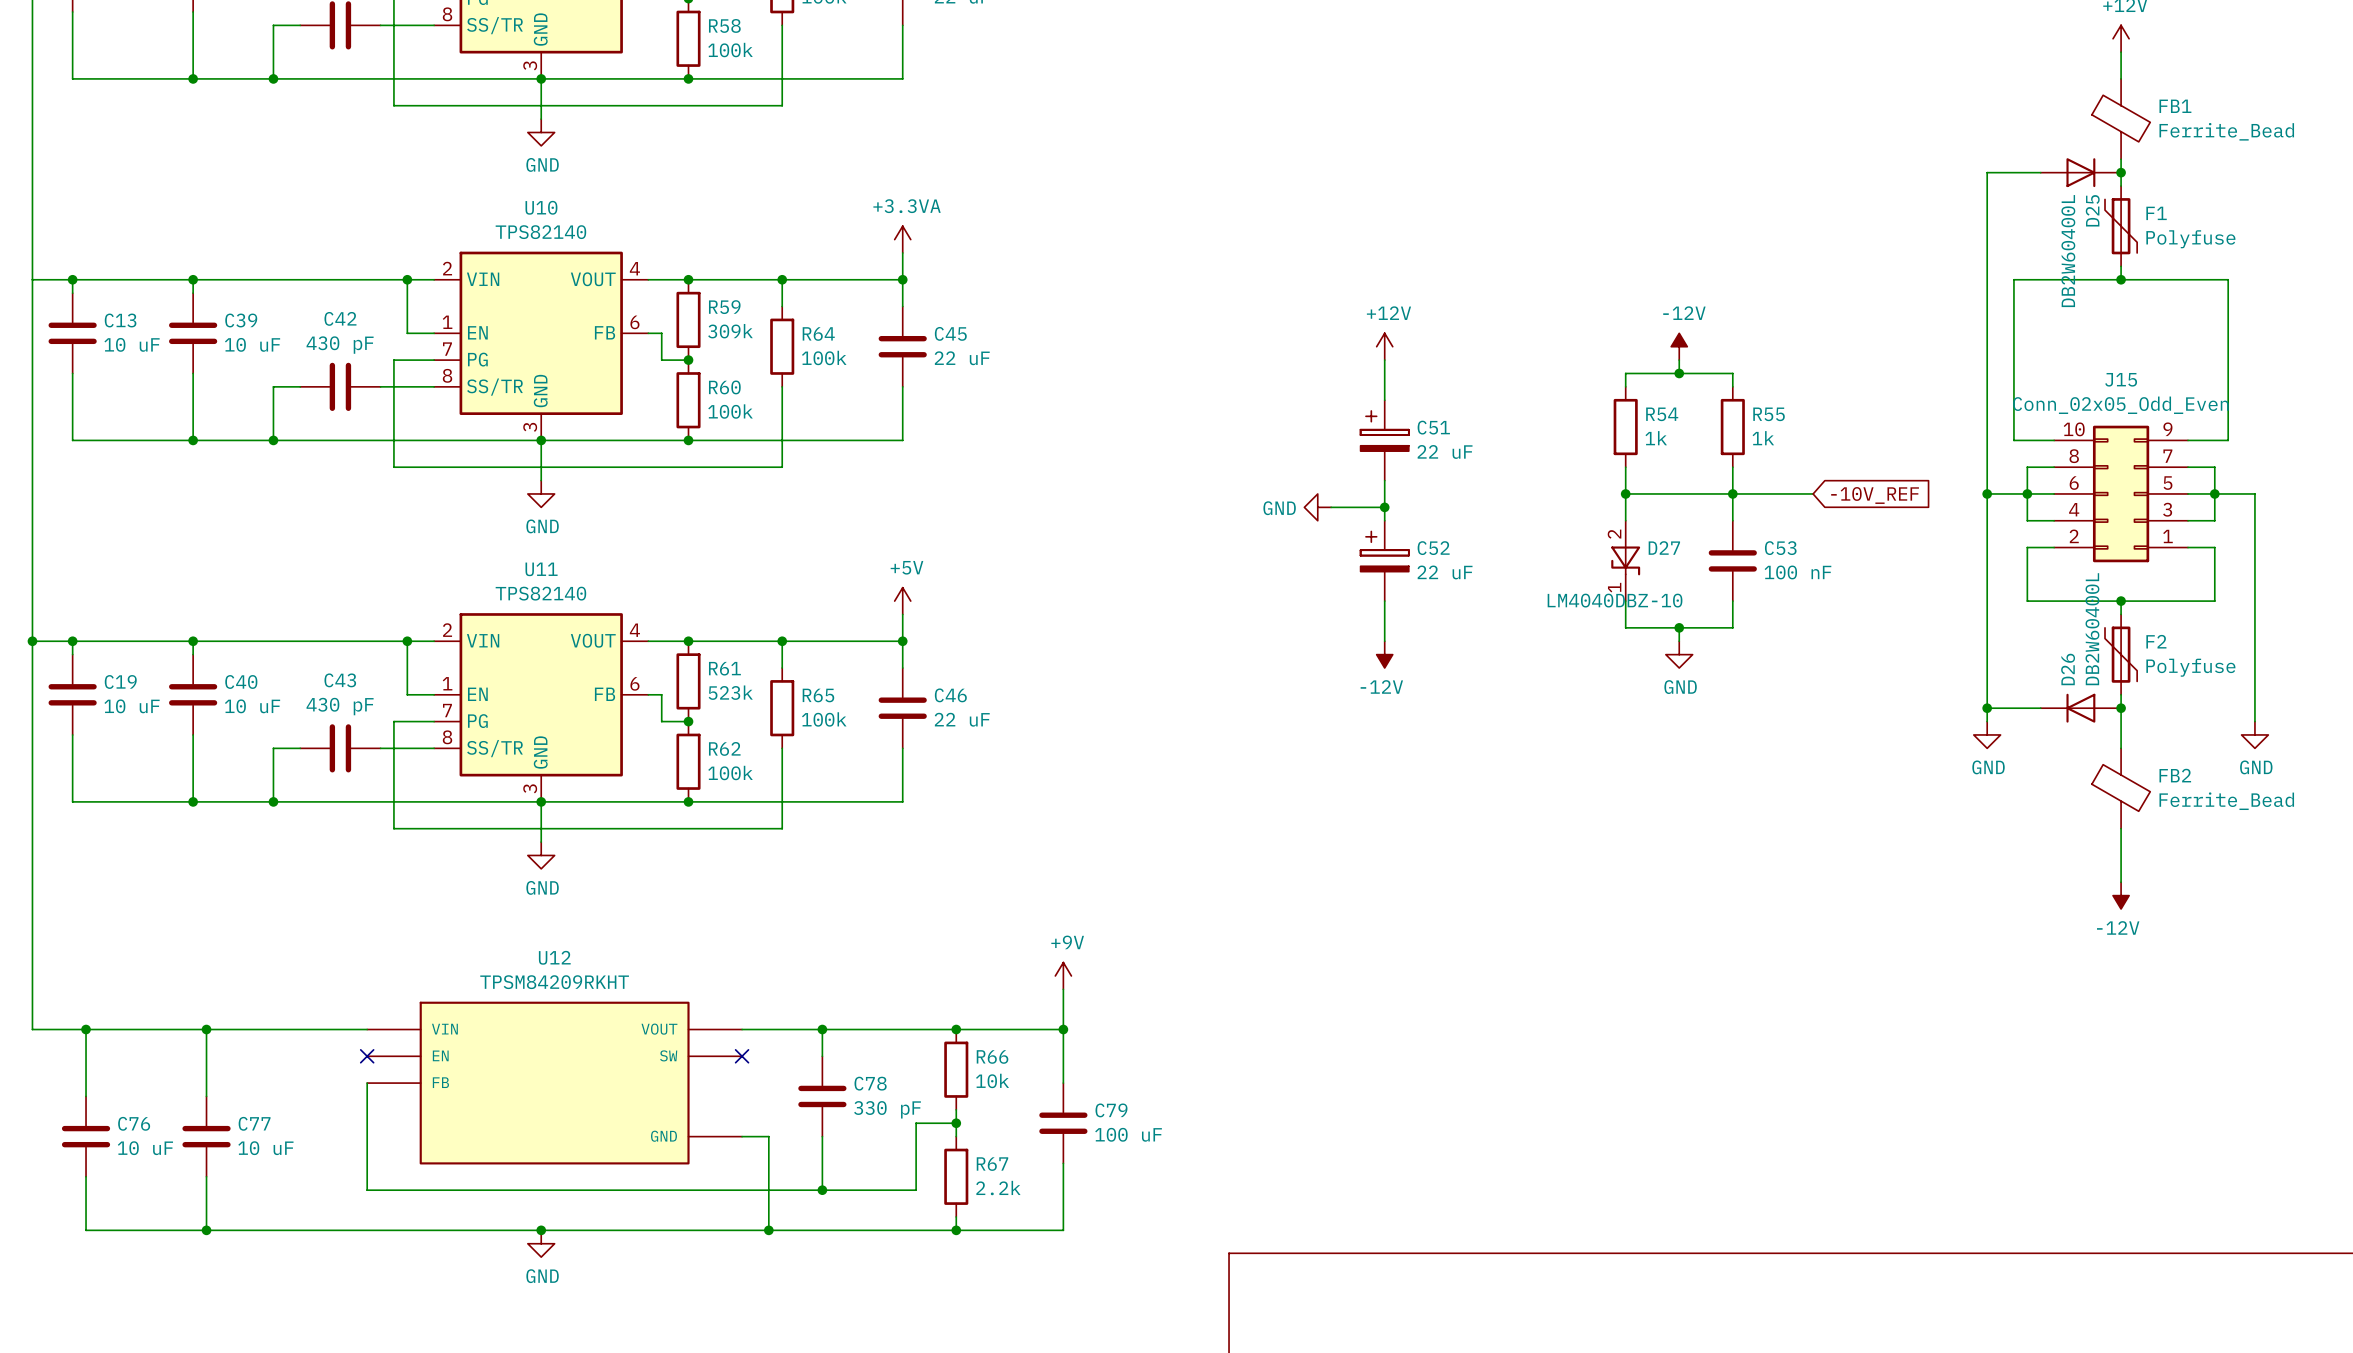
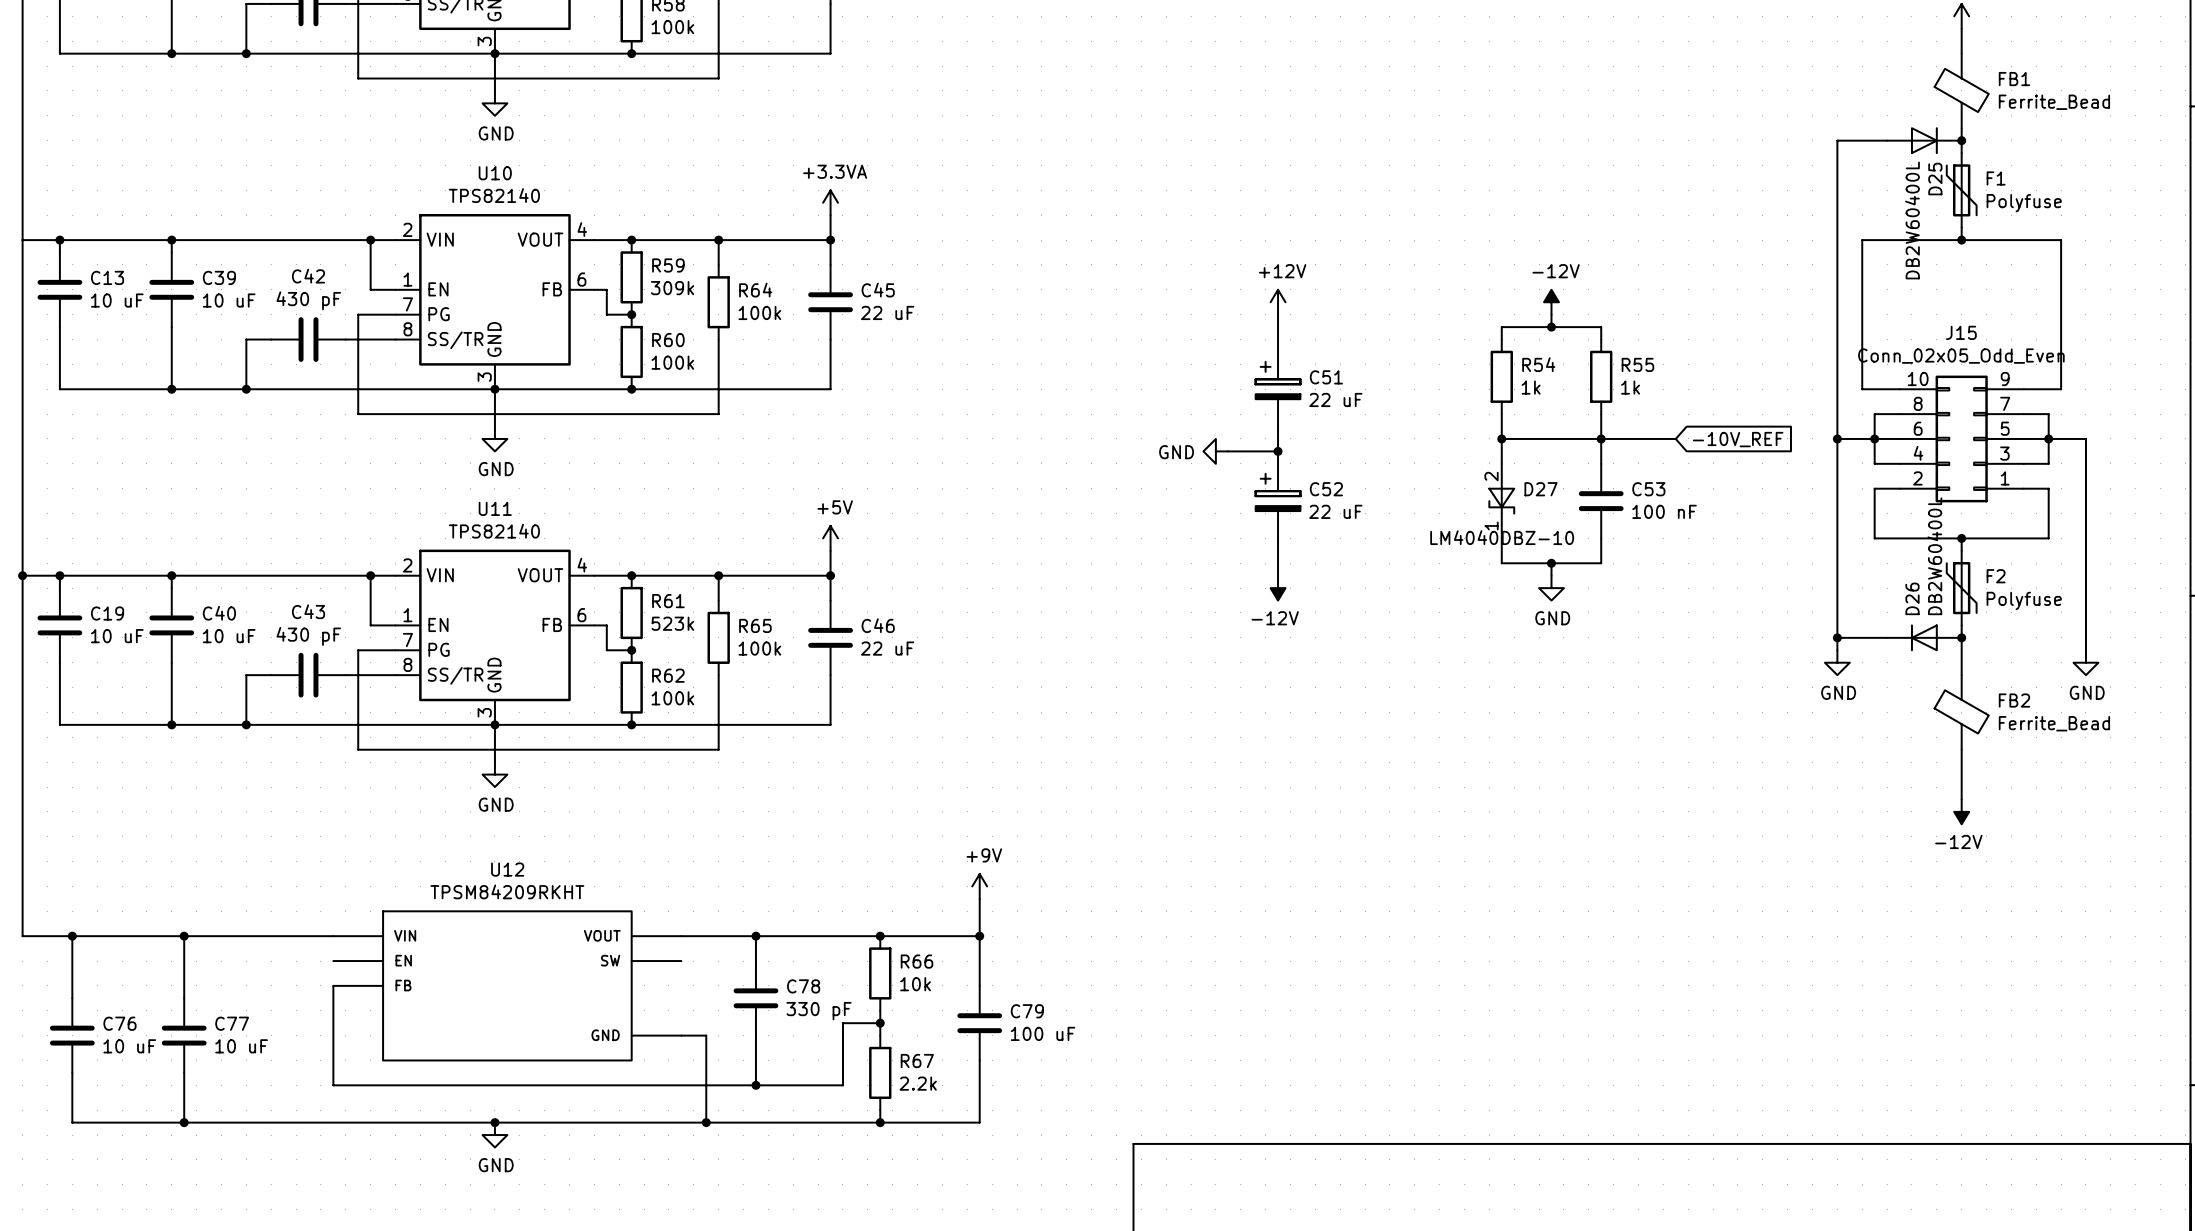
no-connect mark: (367, 1056) -> none
no-connect mark: (742, 1056) -> none

